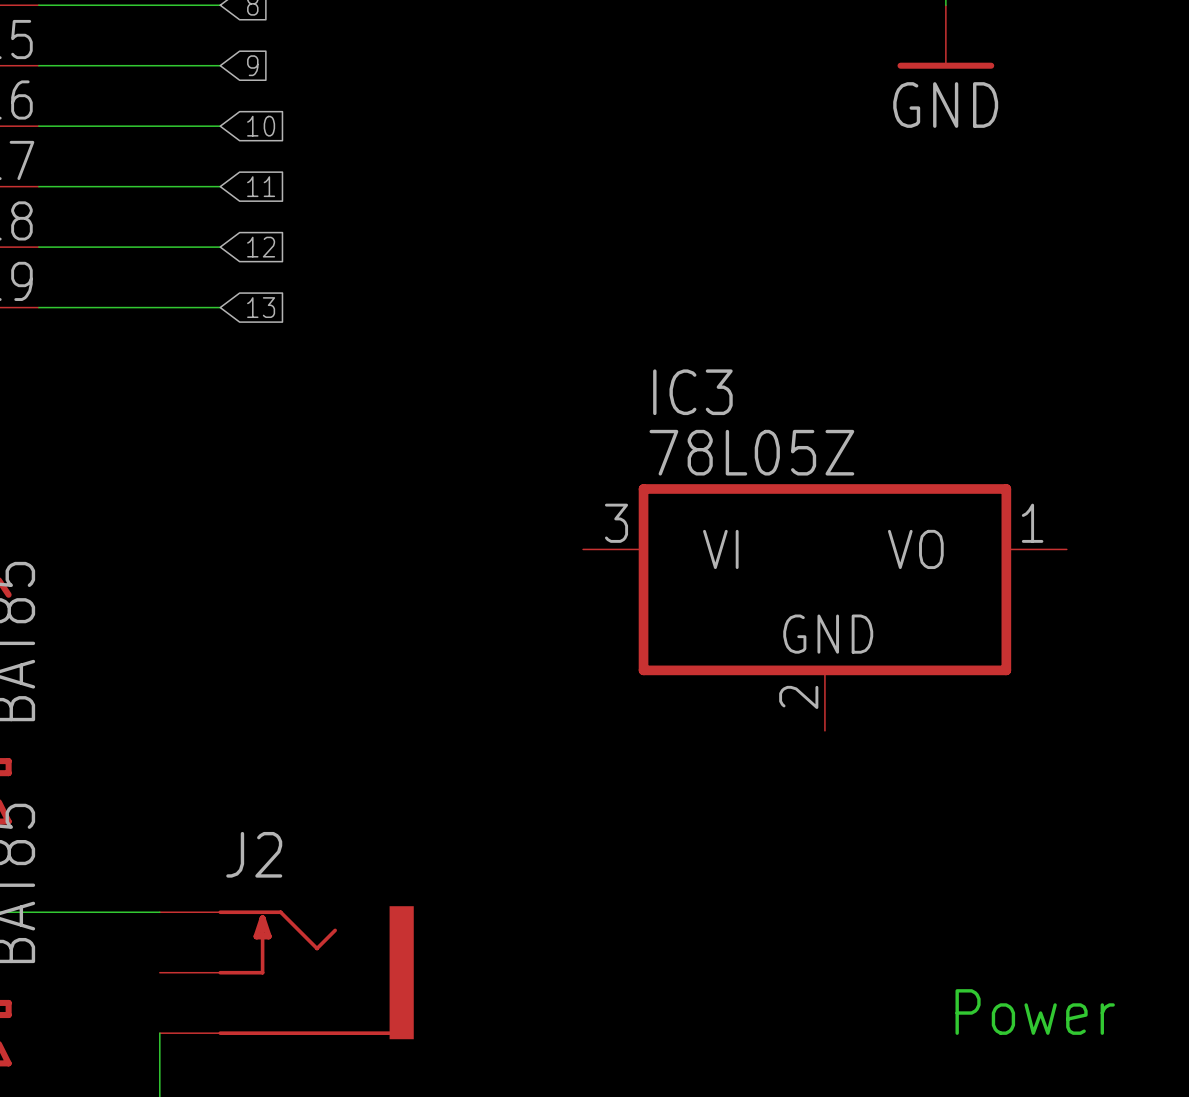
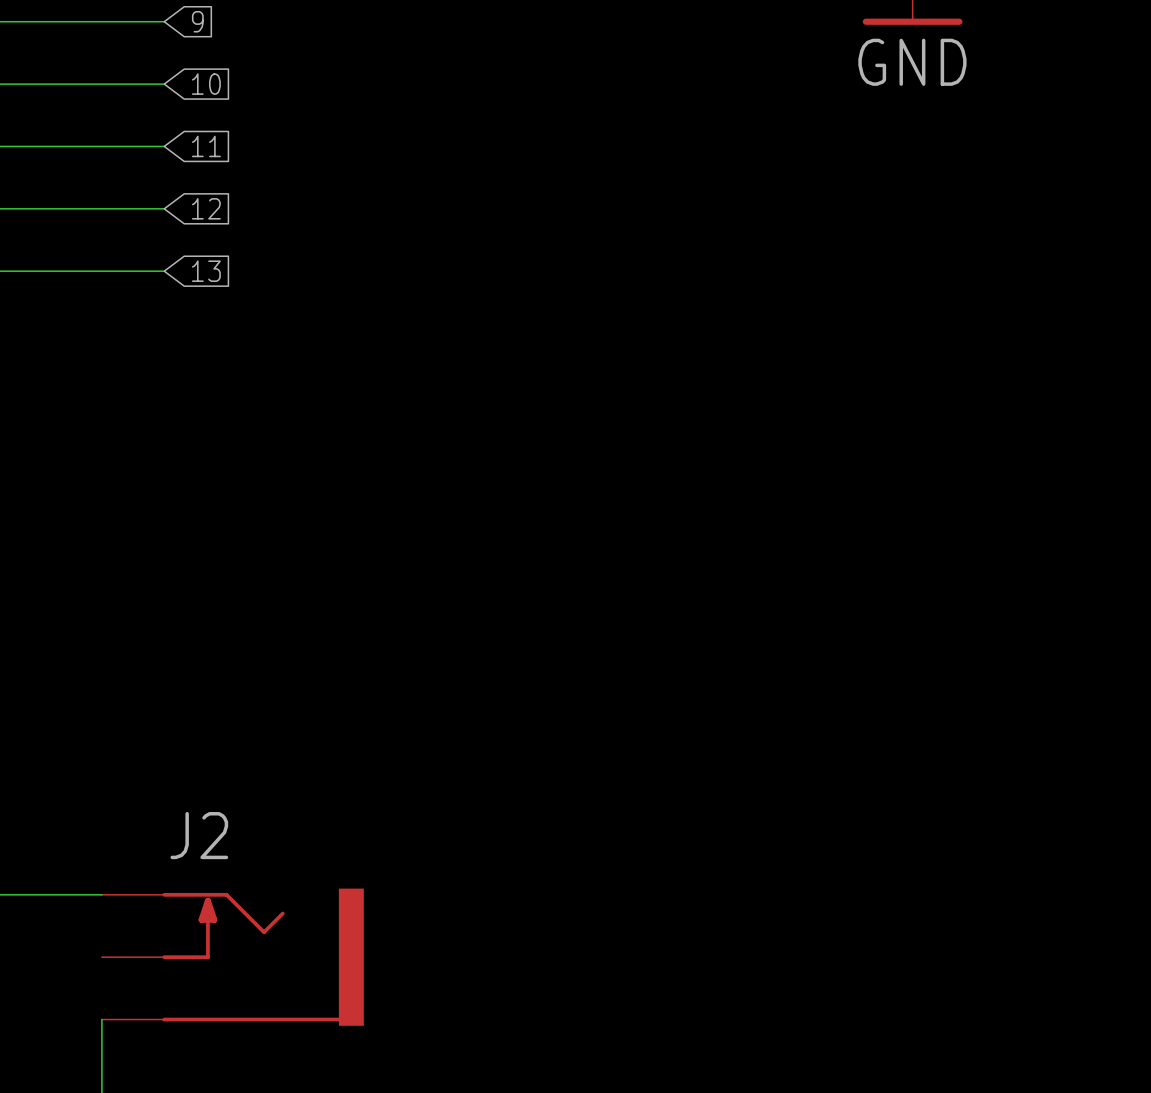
IC3: 78L05Z (824, 607) -> none
text: Power (1035, 1012) -> none

